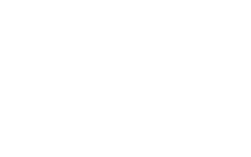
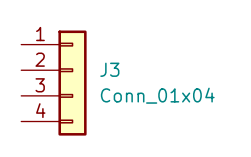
J3: none -> Conn_01x04 (53, 83)

